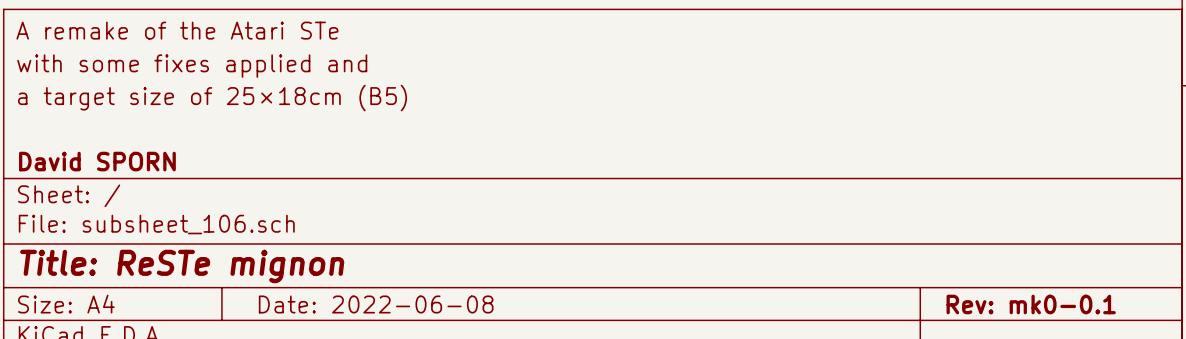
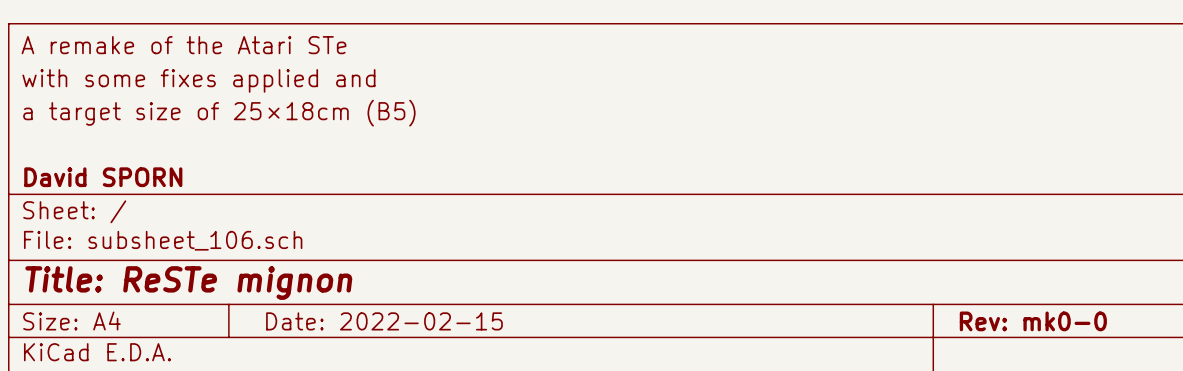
title block: Date: 2022-06-08 (376, 304) -> Date: 2022-02-15 (384, 321)
title block: Rev: mk0-0.1 (1031, 304) -> Rev: mk0-0 (1033, 321)

